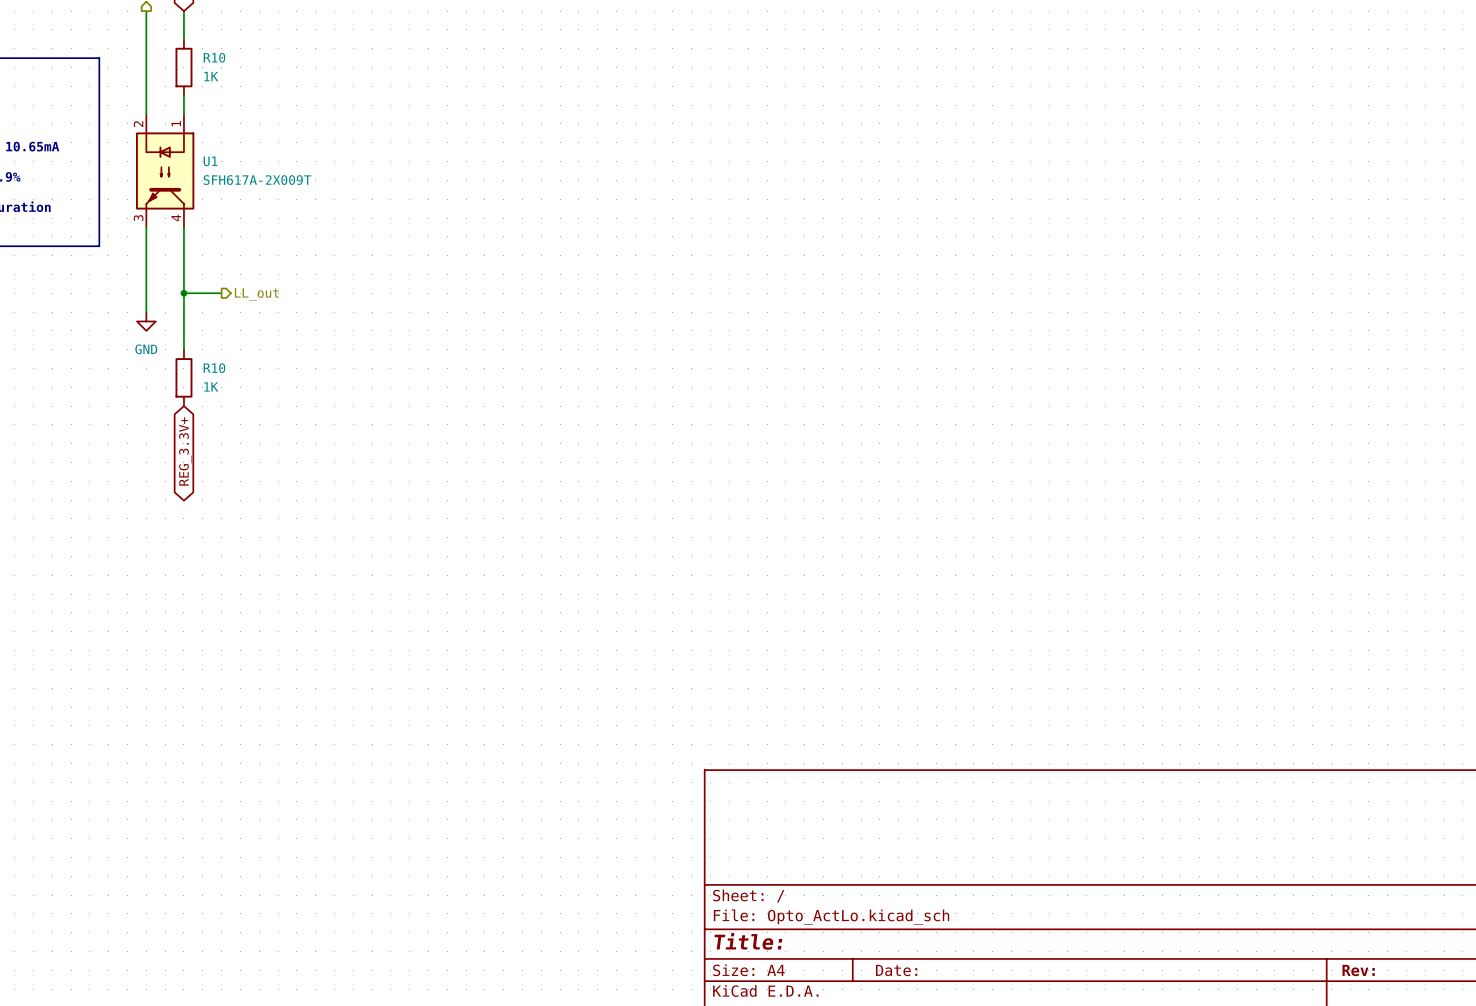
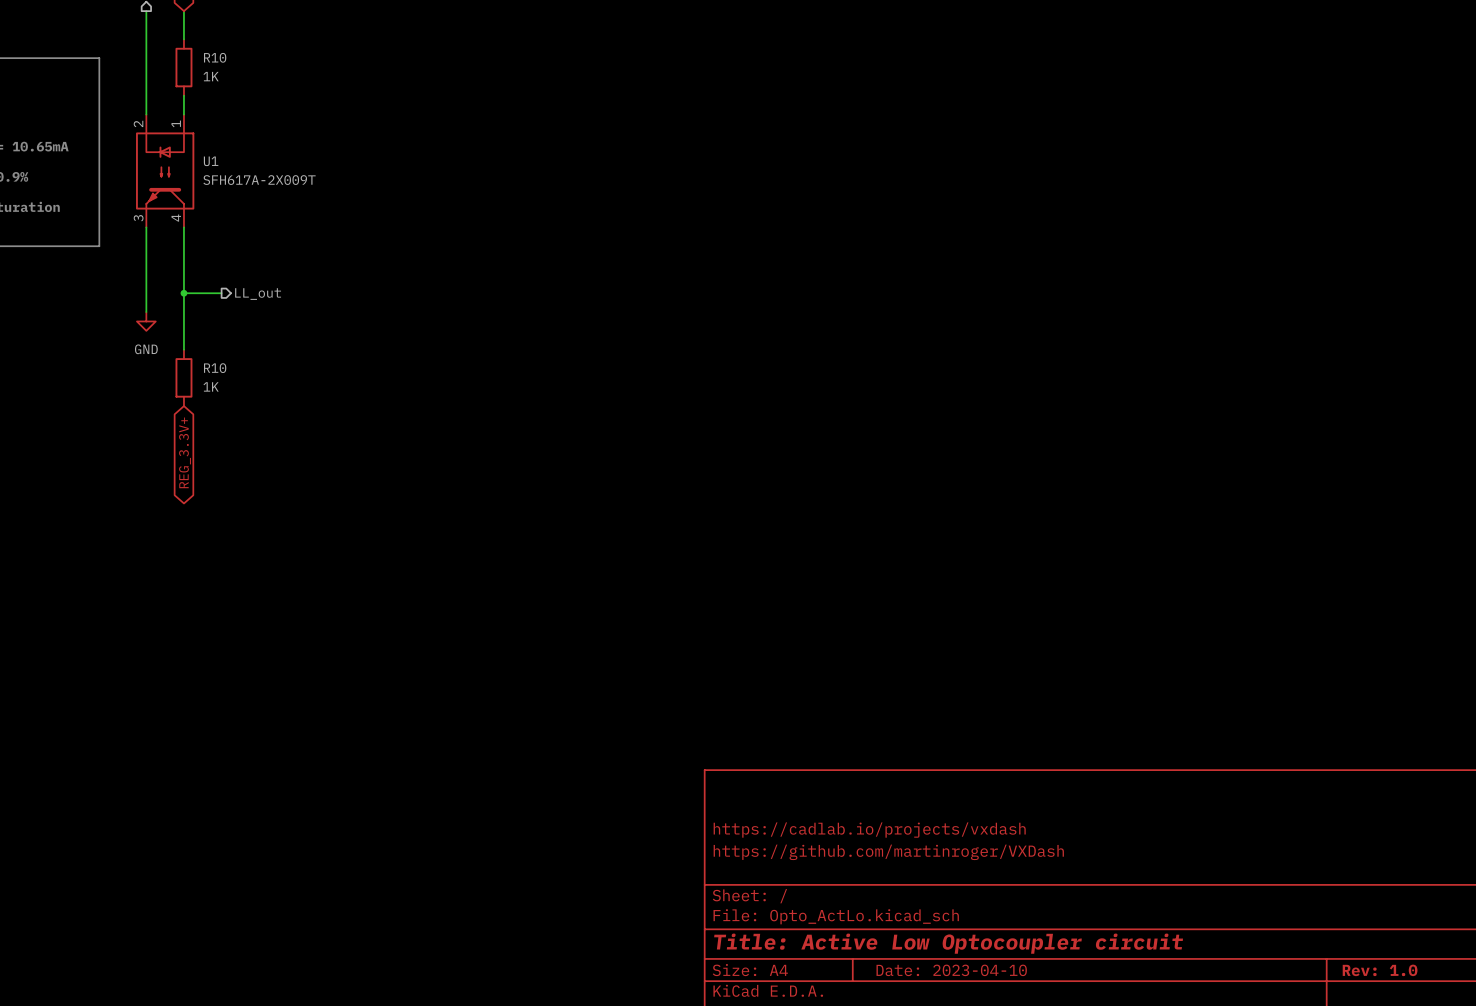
title block: none -> https://cadlab.io/projects/vxdash (869, 830)
title block: none -> https://github.com/martinroger/VXDash (888, 852)
title block: Title: (748, 941) -> Title: Active Low Optocoupler circuit (948, 943)
title block: Date: (896, 970) -> Date: 2023-04-10 (951, 970)
title block: Rev: (1358, 970) -> Rev: 1.0 (1380, 970)

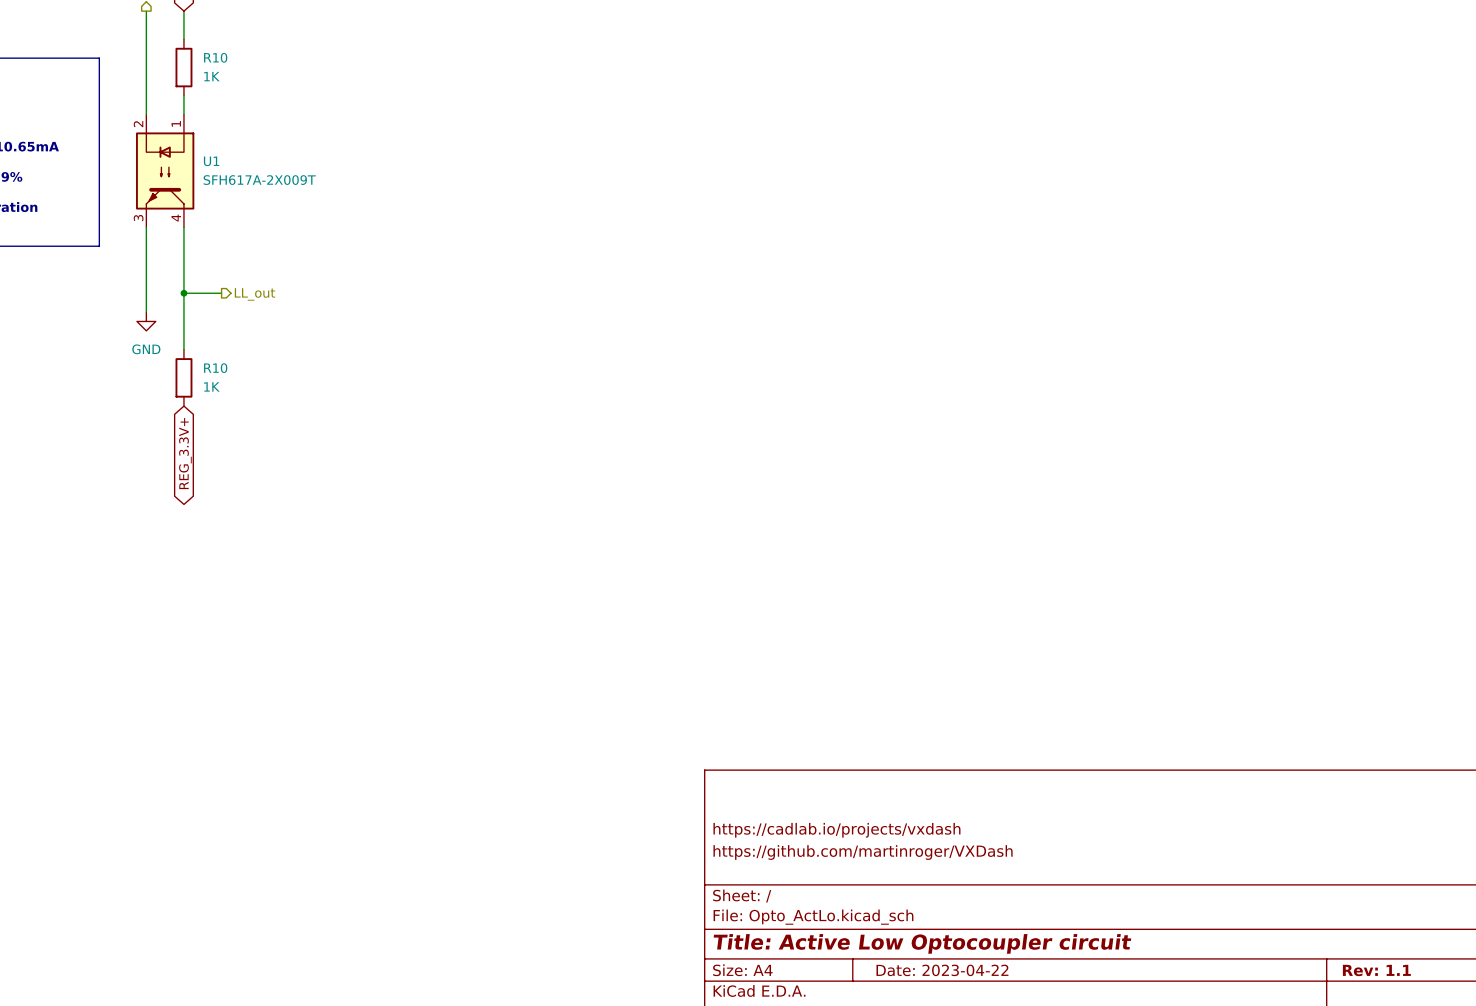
title block: Date: 2023-04-10 (951, 970) -> Date: 2023-04-22 (942, 970)
title block: Rev: 1.0 (1380, 970) -> Rev: 1.1 (1376, 970)

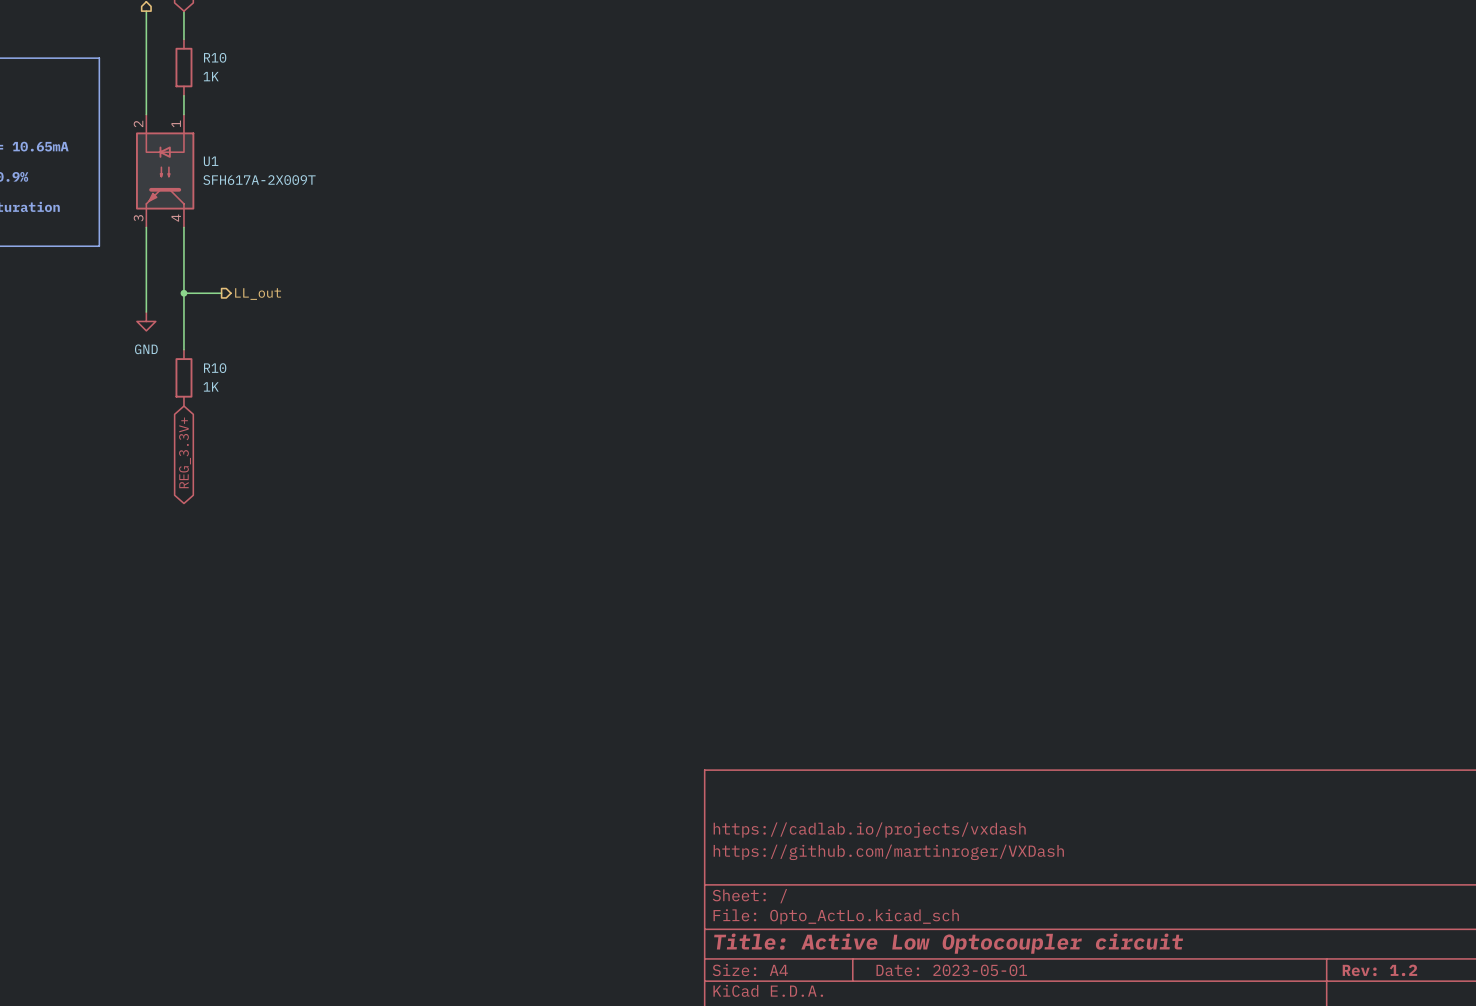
title block: Date: 2023-04-22 (942, 970) -> Date: 2023-05-01 (951, 970)
title block: Rev: 1.1 (1376, 970) -> Rev: 1.2 (1379, 970)

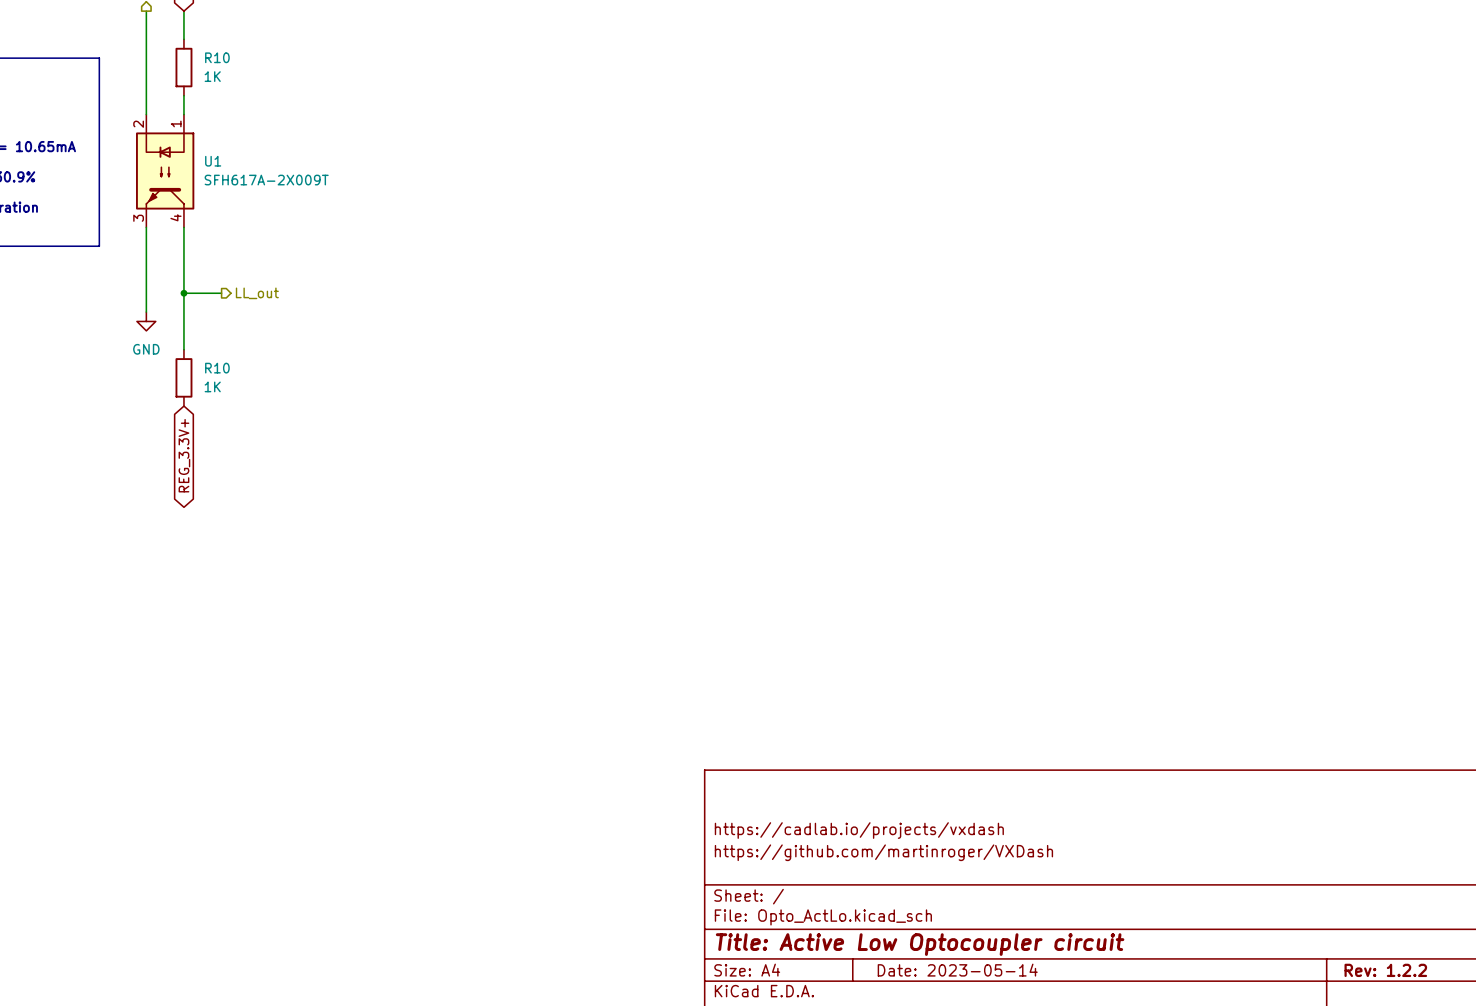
title block: Date: 2023-05-01 (951, 970) -> Date: 2023-05-14 (957, 970)
title block: Rev: 1.2 (1379, 970) -> Rev: 1.2.2 (1385, 970)

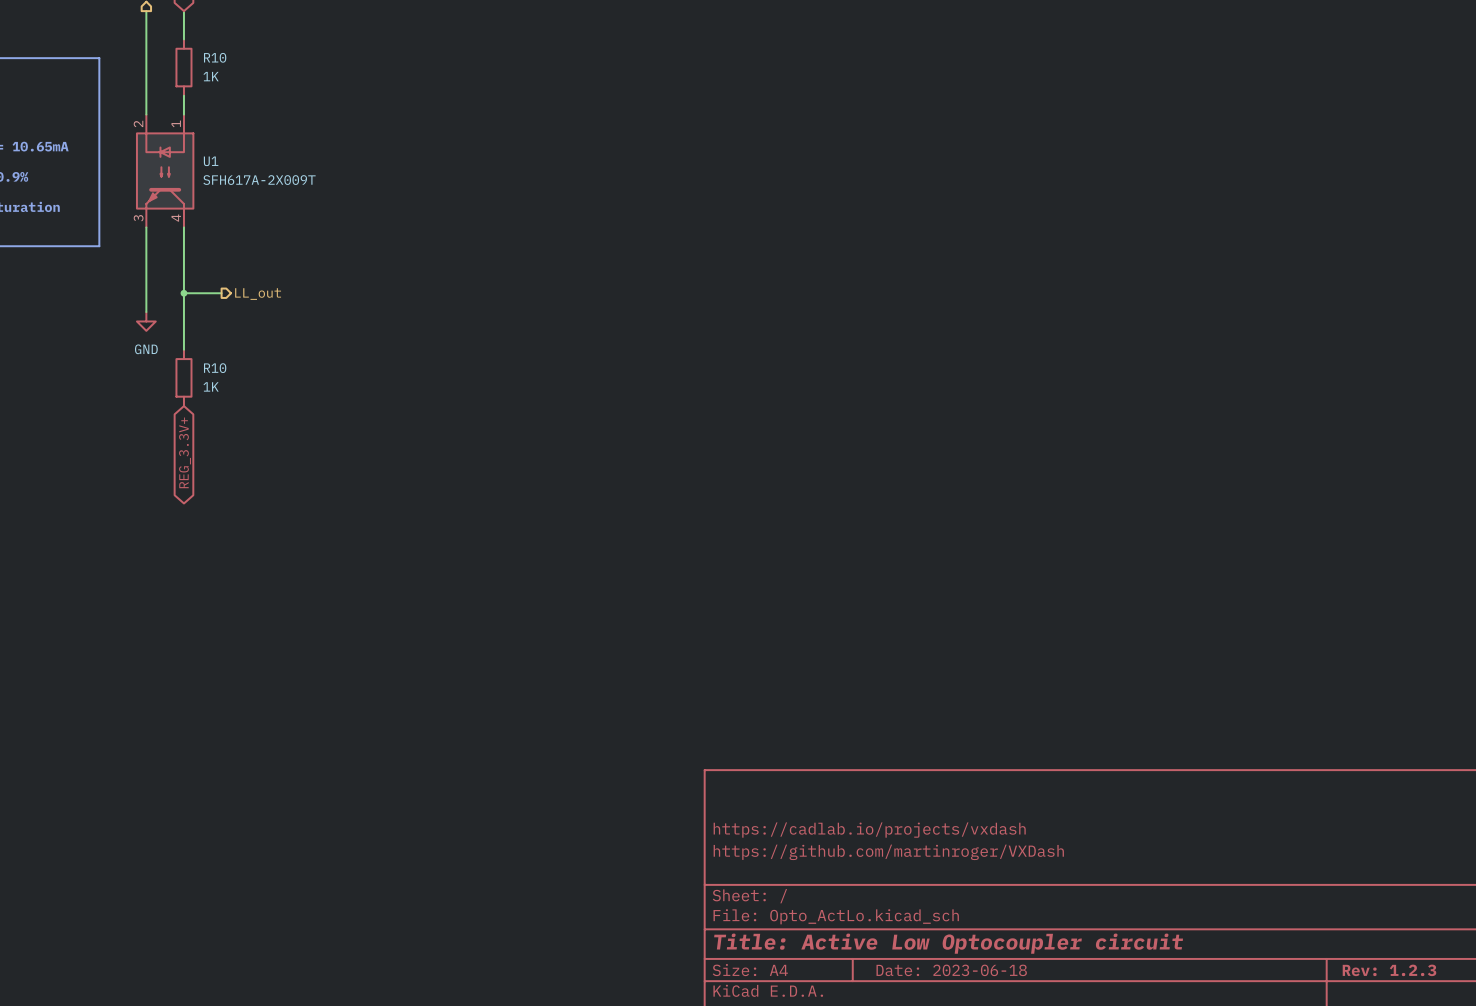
title block: Date: 2023-05-14 (957, 970) -> Date: 2023-06-18 (951, 970)
title block: Rev: 1.2.2 (1385, 970) -> Rev: 1.2.3 (1389, 970)

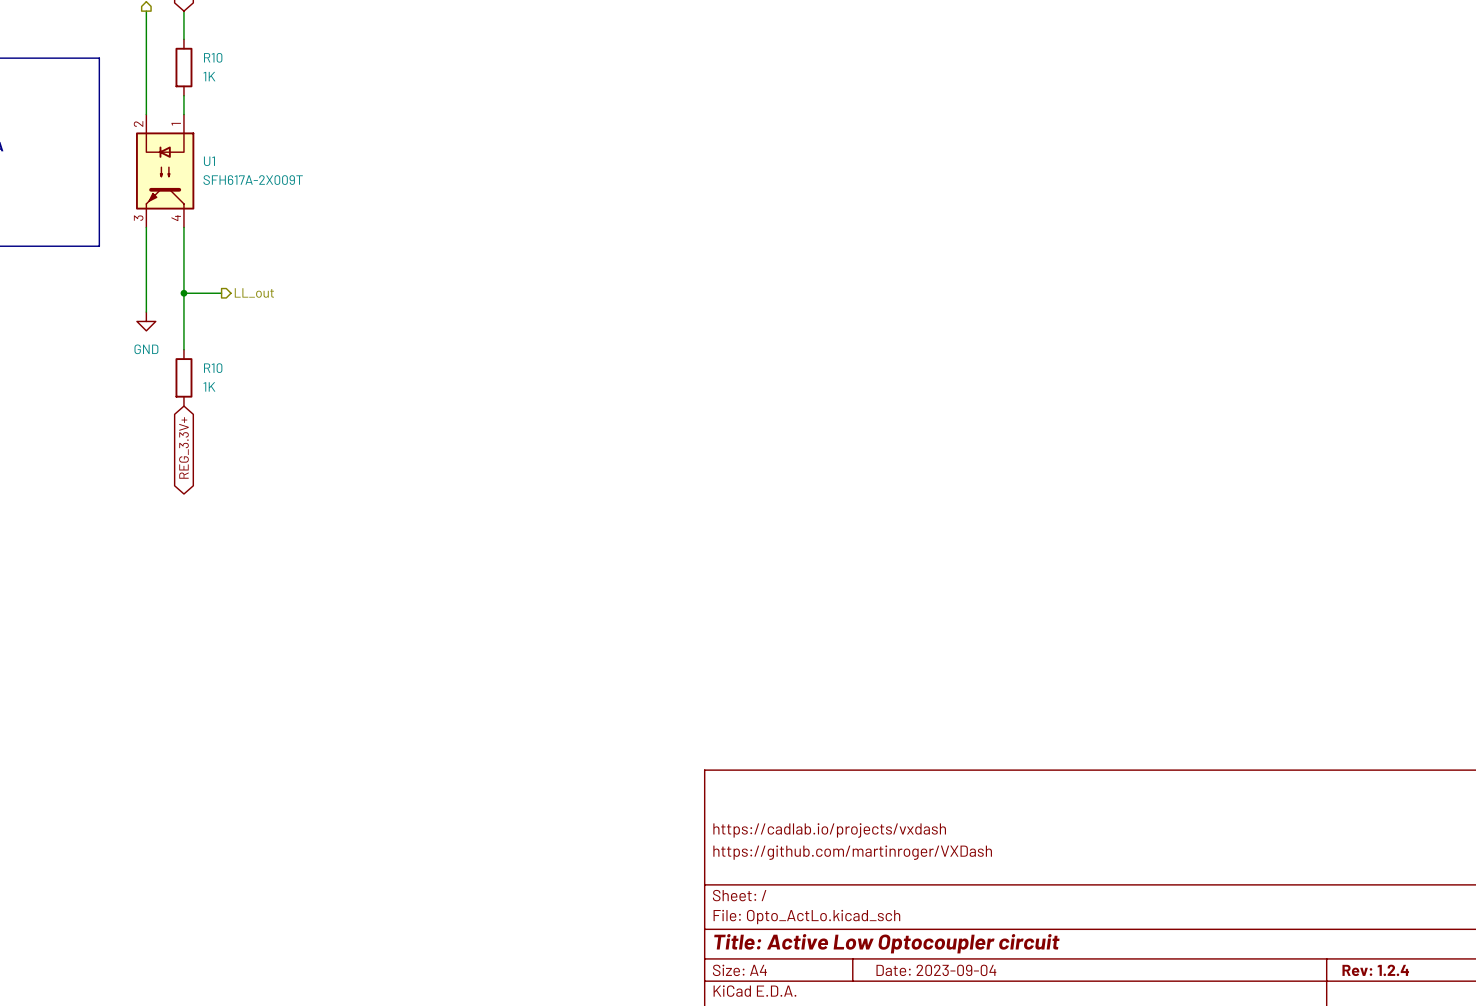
title block: Date: 2023-06-18 (951, 970) -> Date: 2023-09-04 (936, 970)
title block: Rev: 1.2.3 (1389, 970) -> Rev: 1.2.4 (1375, 970)

